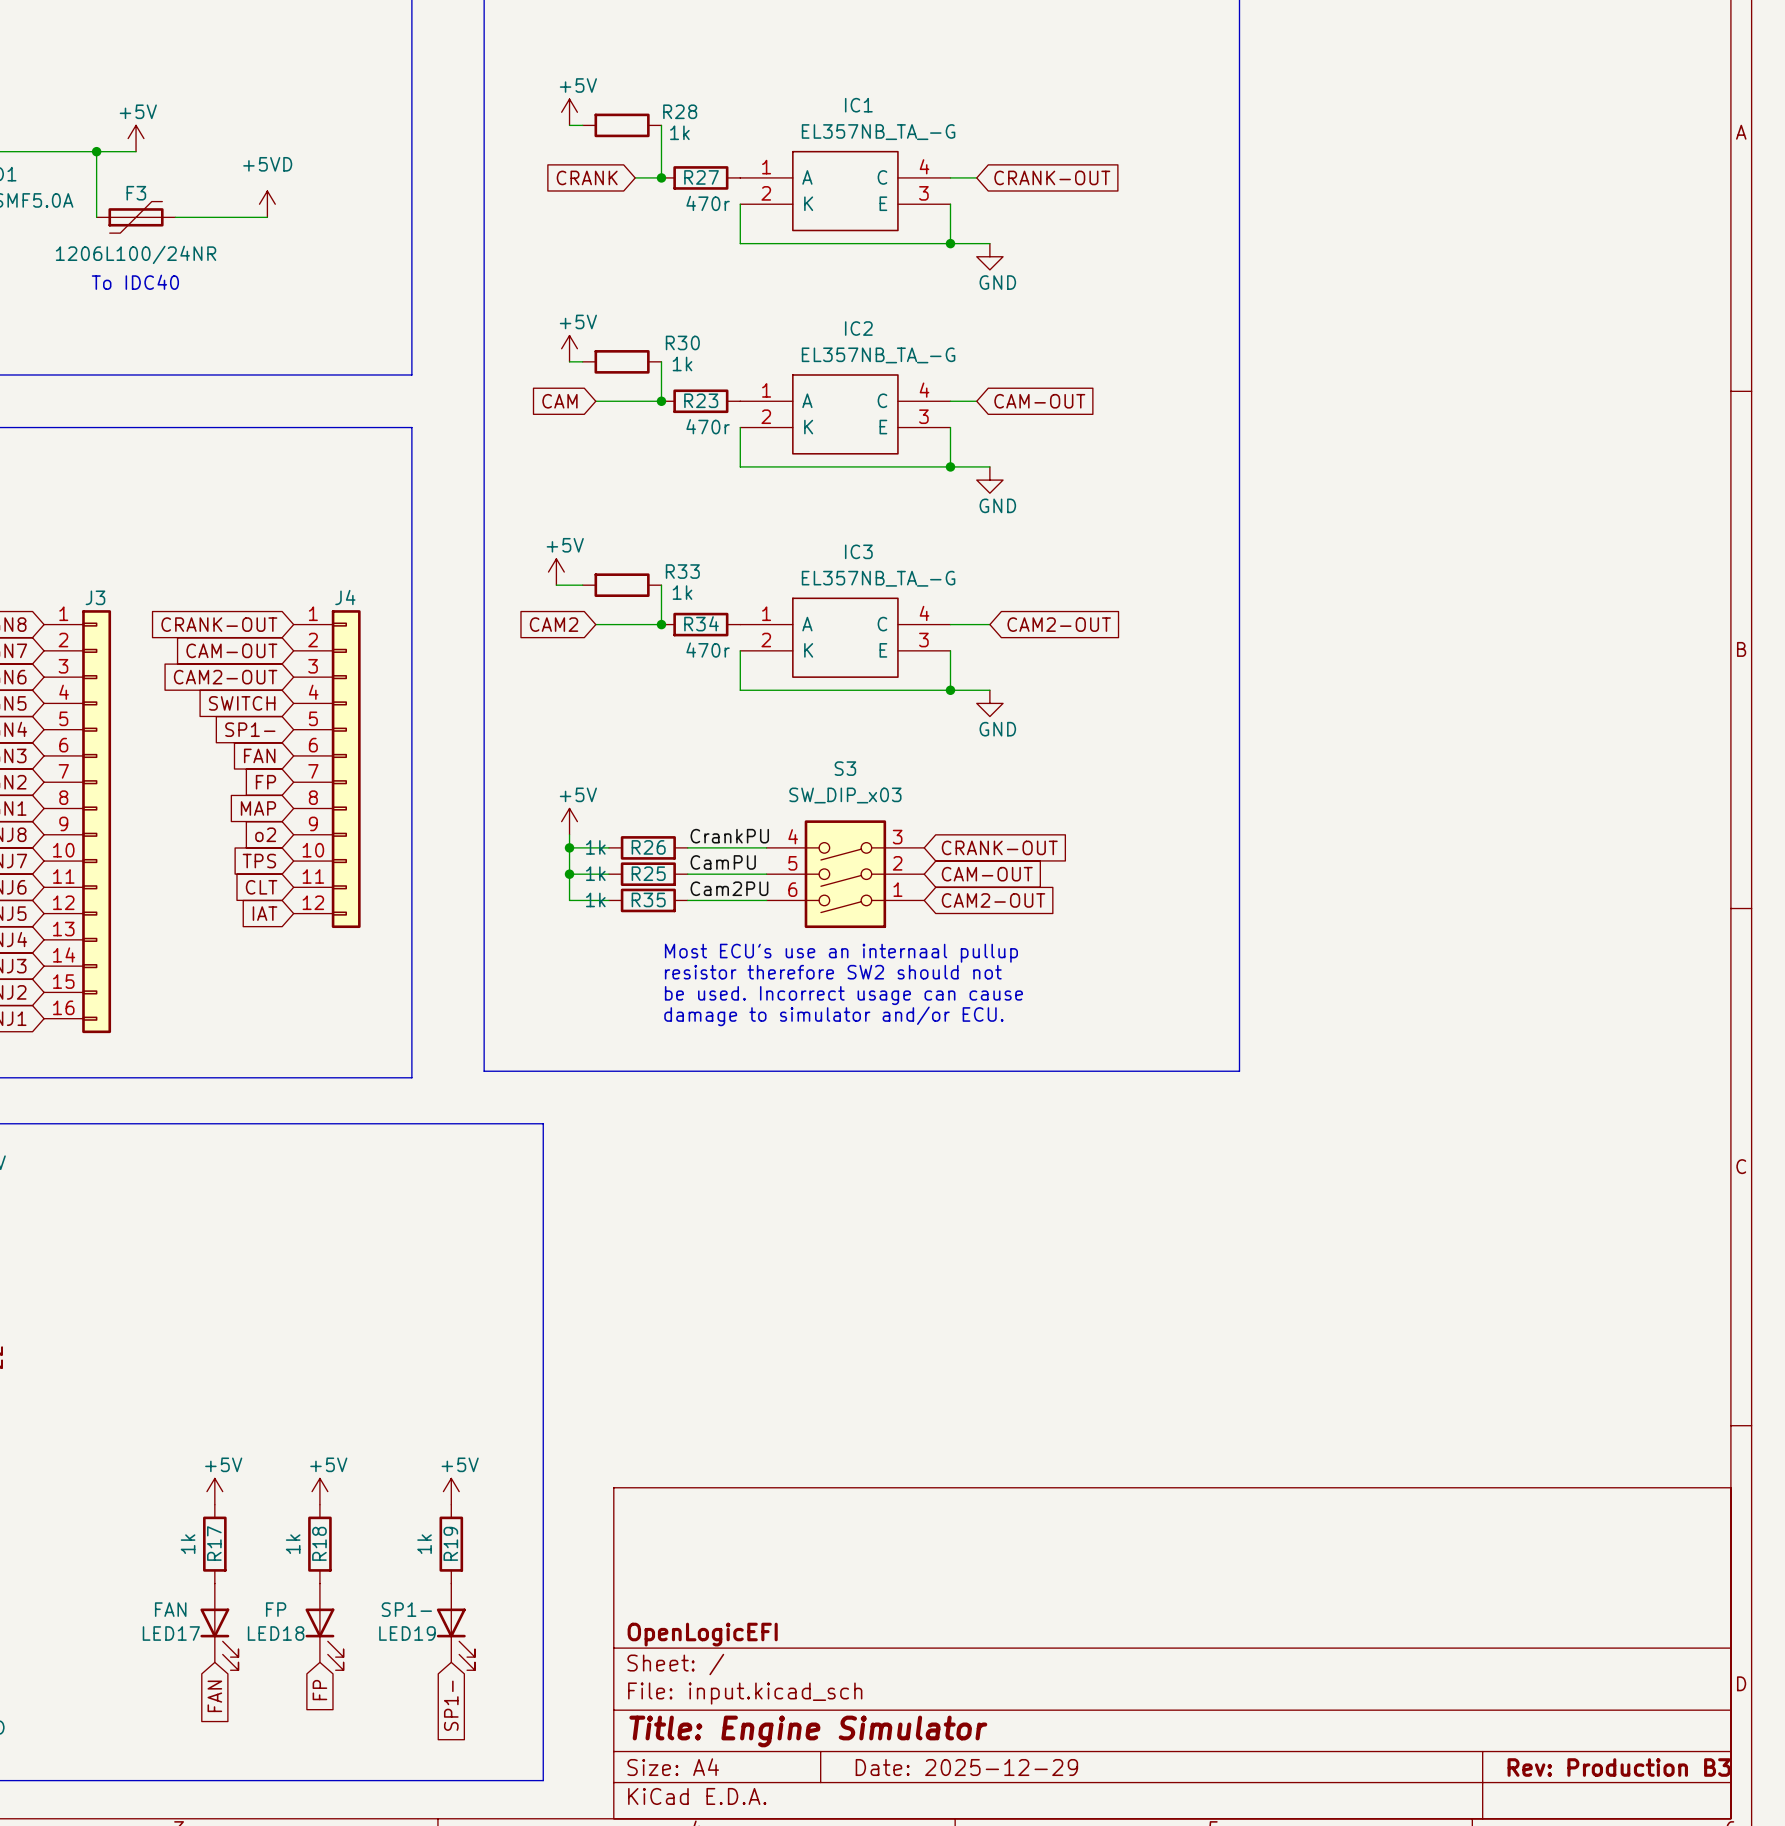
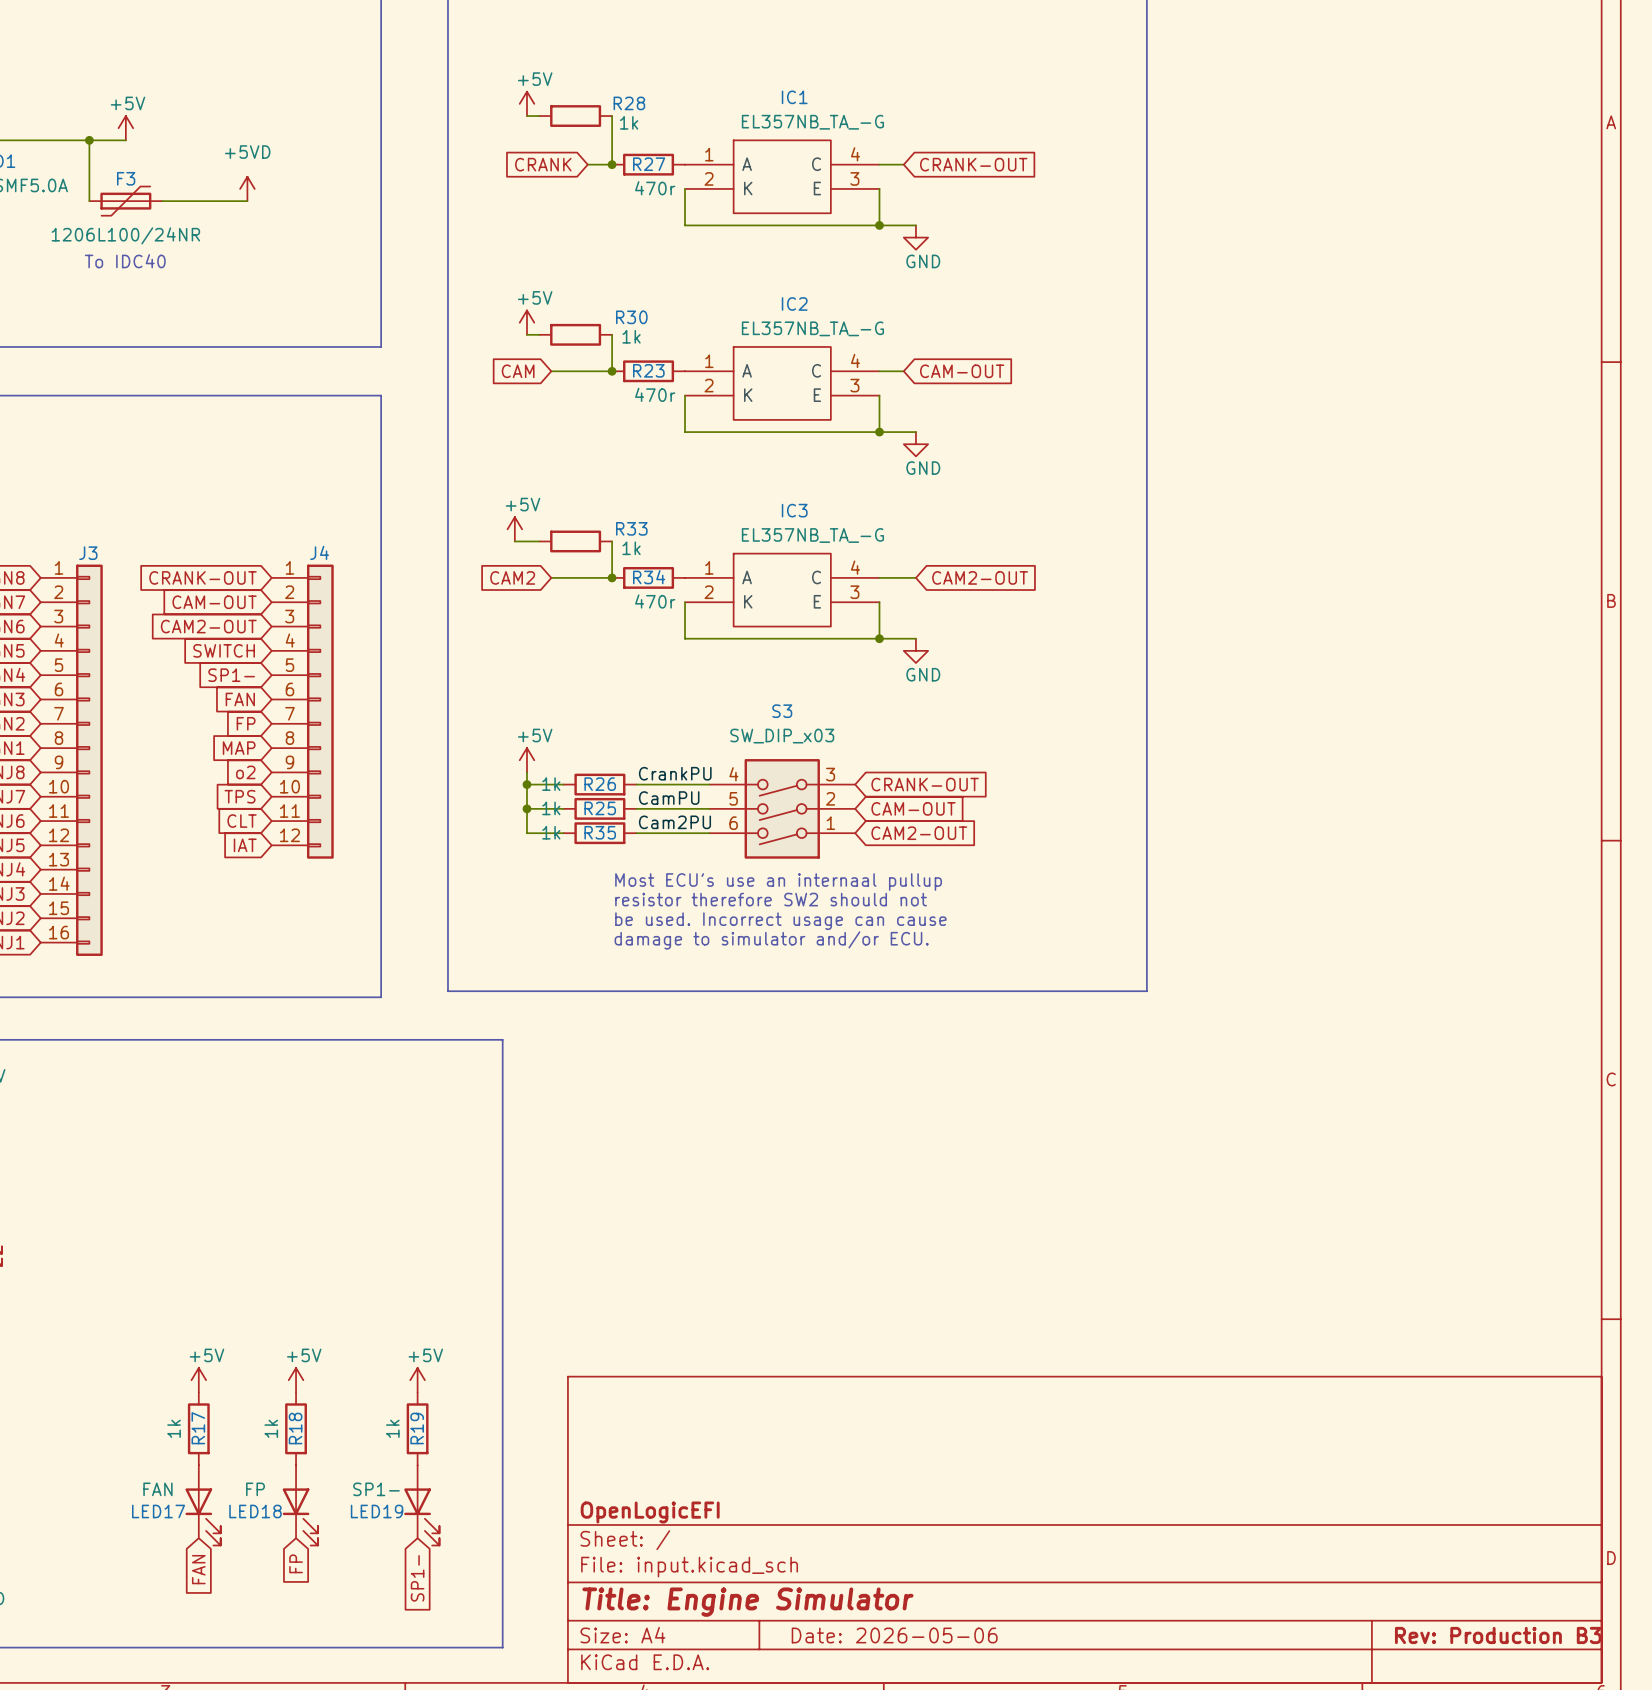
title block: Date: 2025-12-29 (966, 1767) -> Date: 2026-05-06 (894, 1635)

